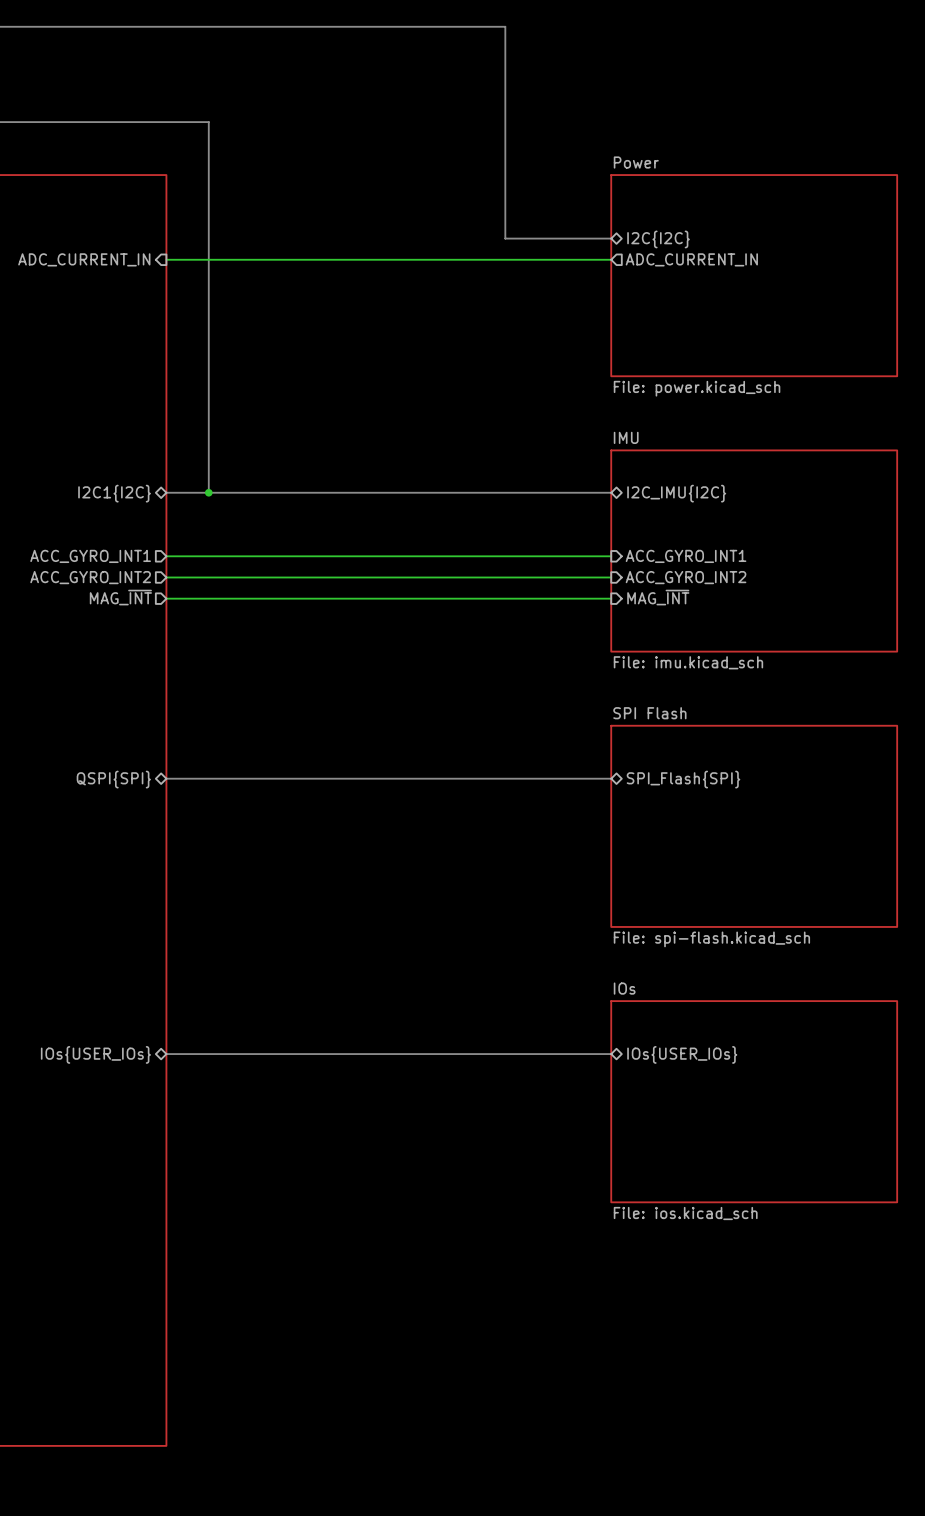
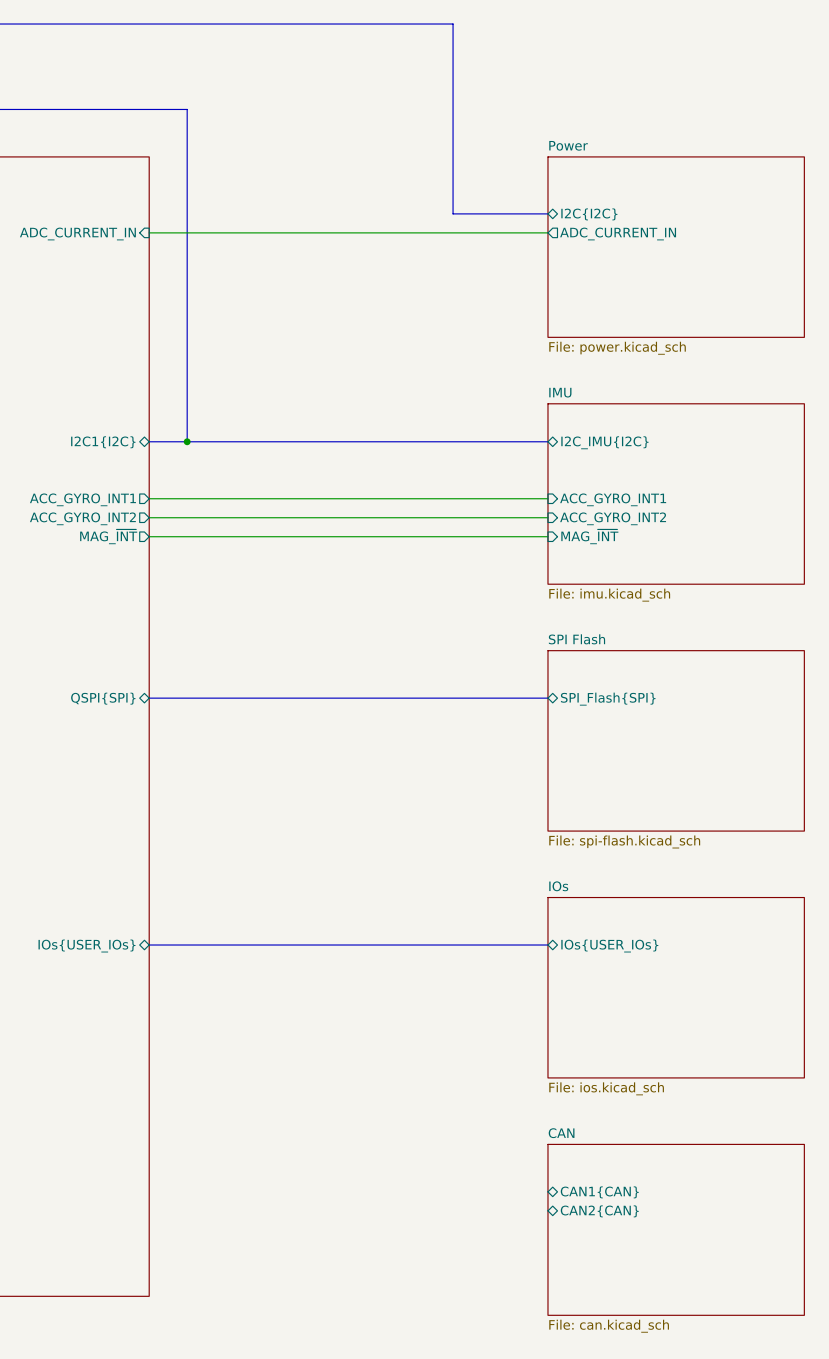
sheet pin: none -> CAN1{CAN} (599, 1192)
sheet pin: none -> CAN2{CAN} (599, 1211)
sheet CAN: none -> File: can.kicad_sch (676, 1229)

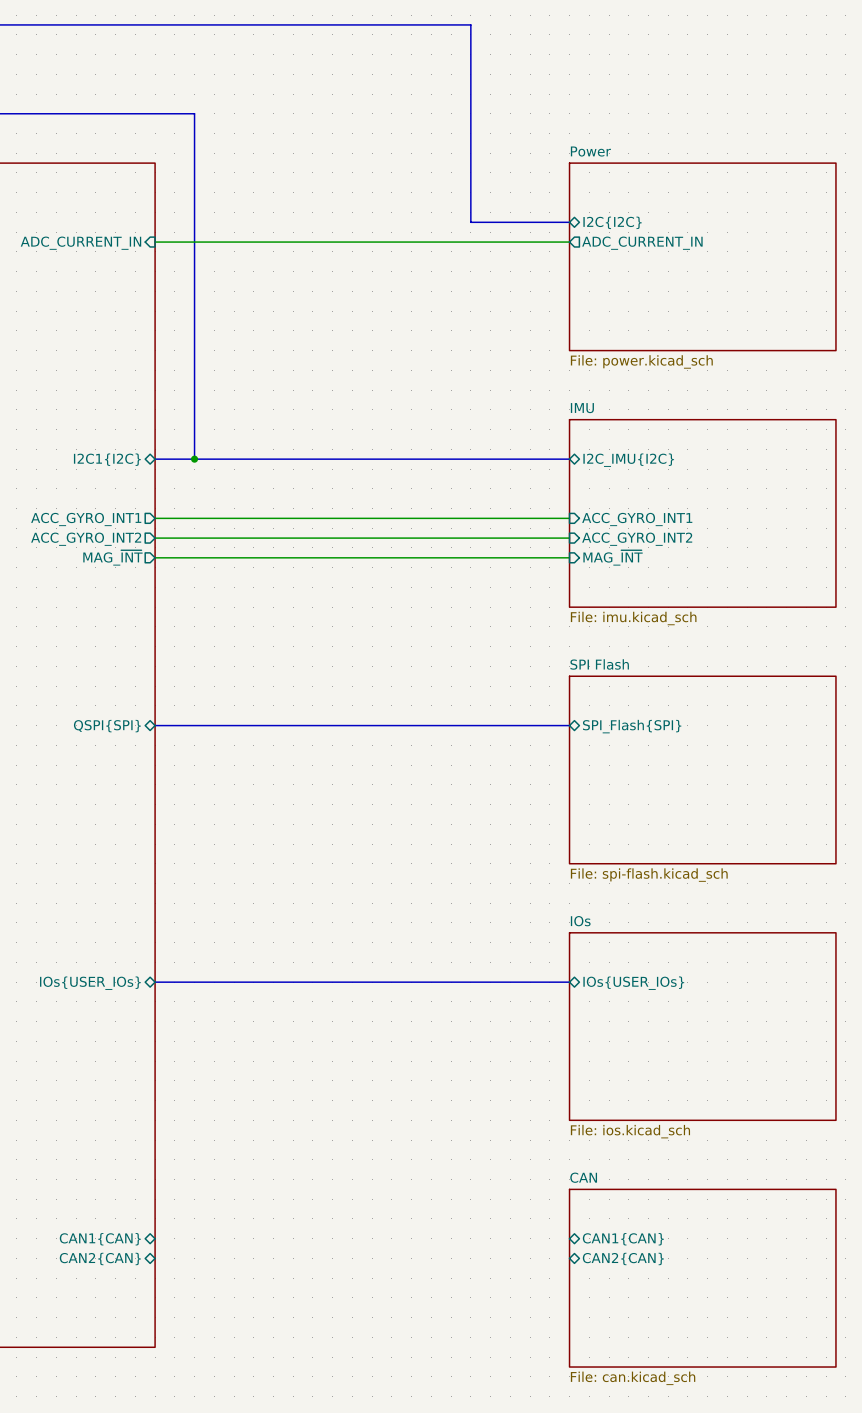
sheet pin: none -> CAN1{CAN} (100, 1239)
sheet pin: none -> CAN2{CAN} (100, 1258)

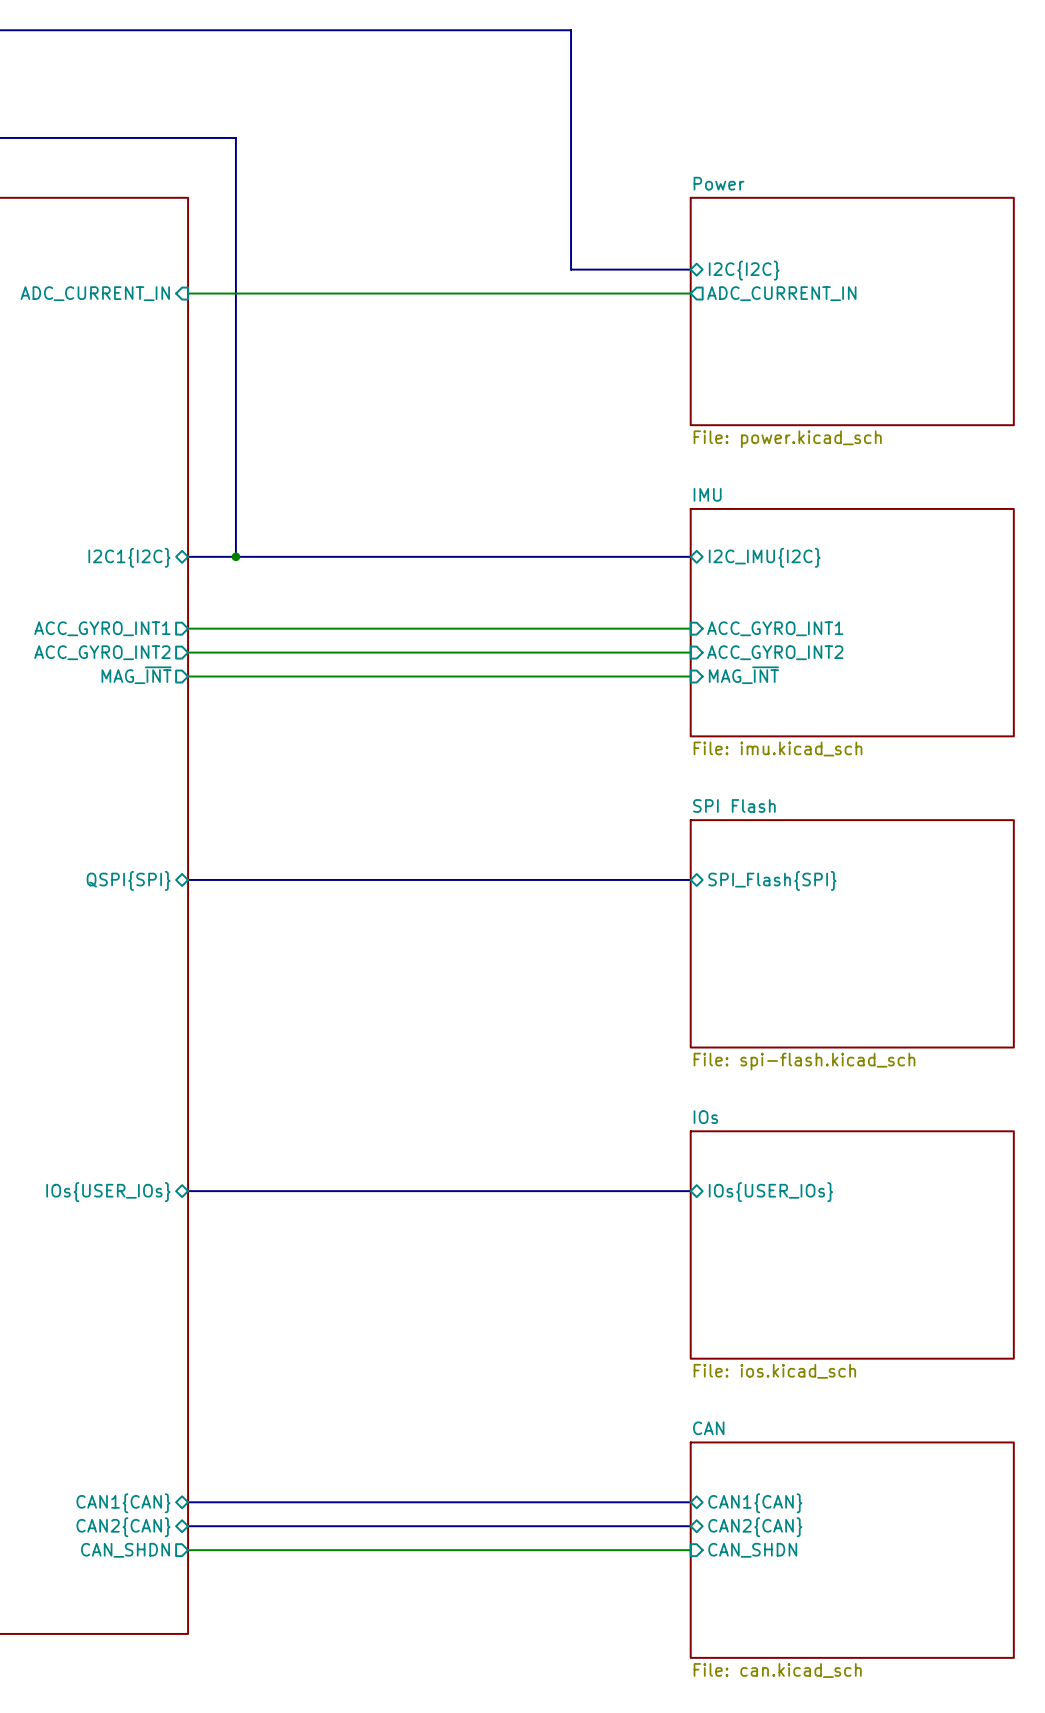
bus: none -> (188, 1502) (690, 1502)
bus: none -> (188, 1526) (690, 1526)
wire: none -> (188, 1550) (690, 1550)
sheet pin: none -> CAN_SHDN (125, 1550)
sheet pin: none -> CAN_SHDN (752, 1550)

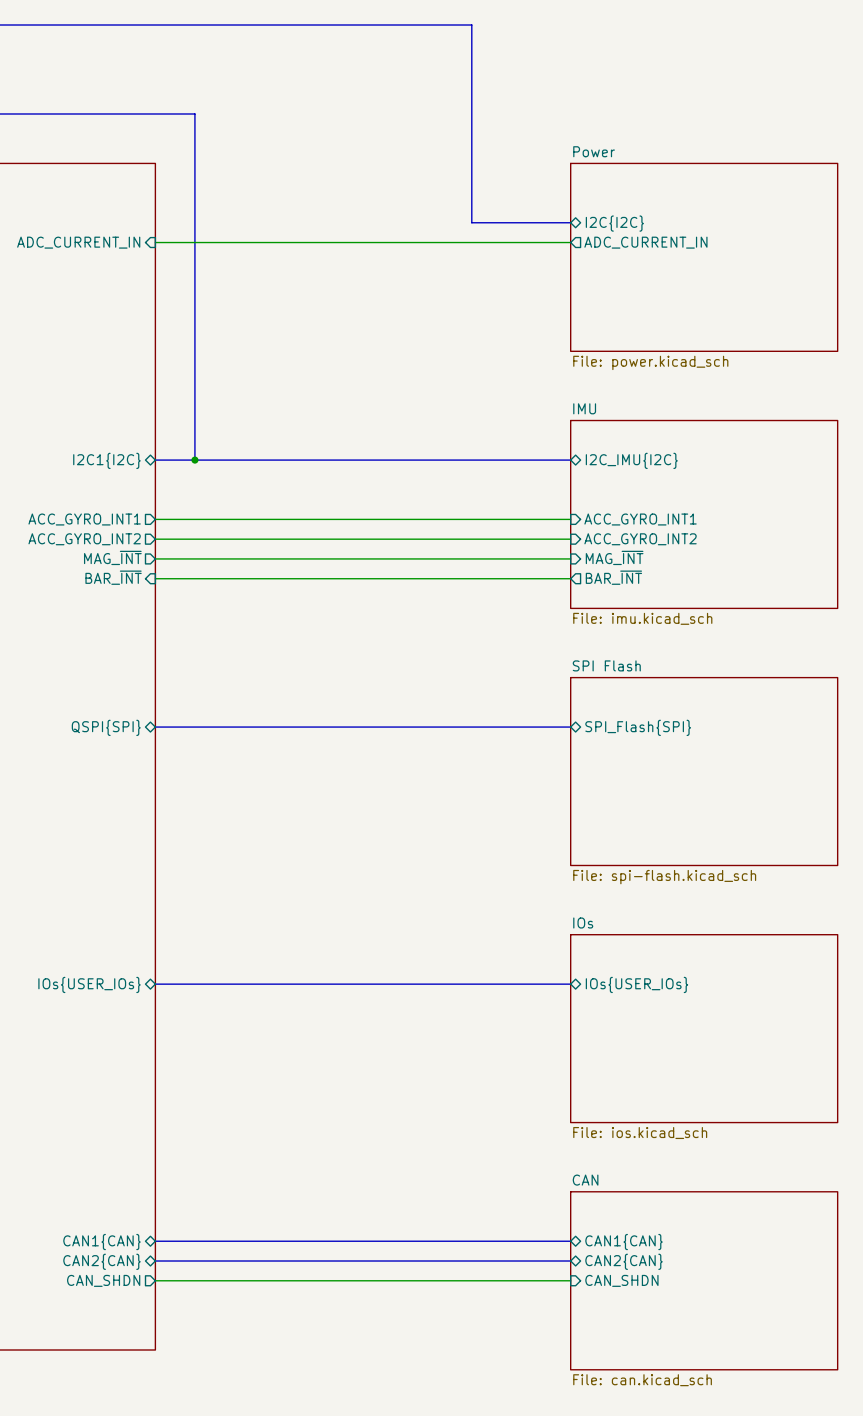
sheet pin: none -> BAR_~{INT} (113, 577)
sheet pin: none -> BAR_~{INT} (613, 577)
wire: none -> (155, 578) (570, 578)

